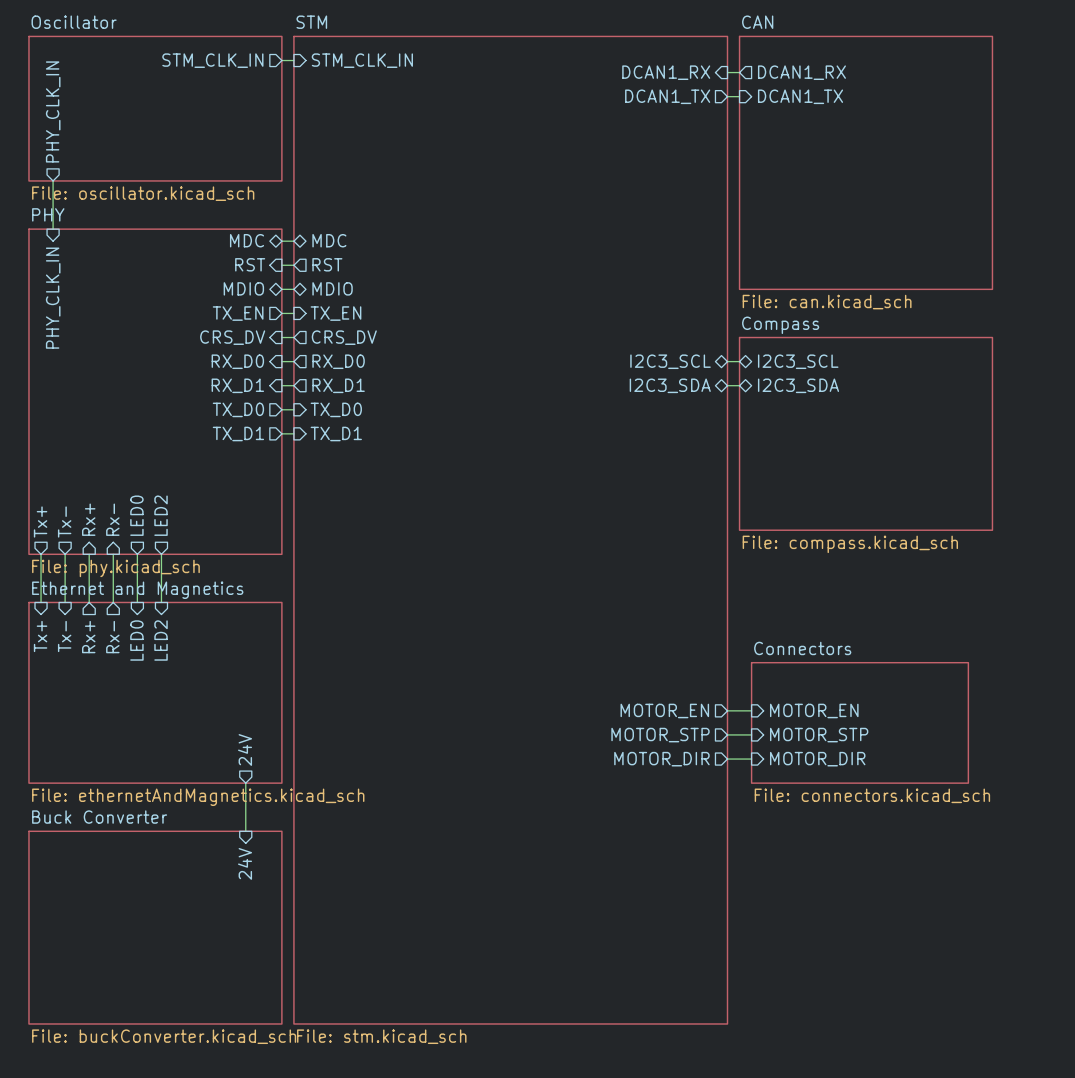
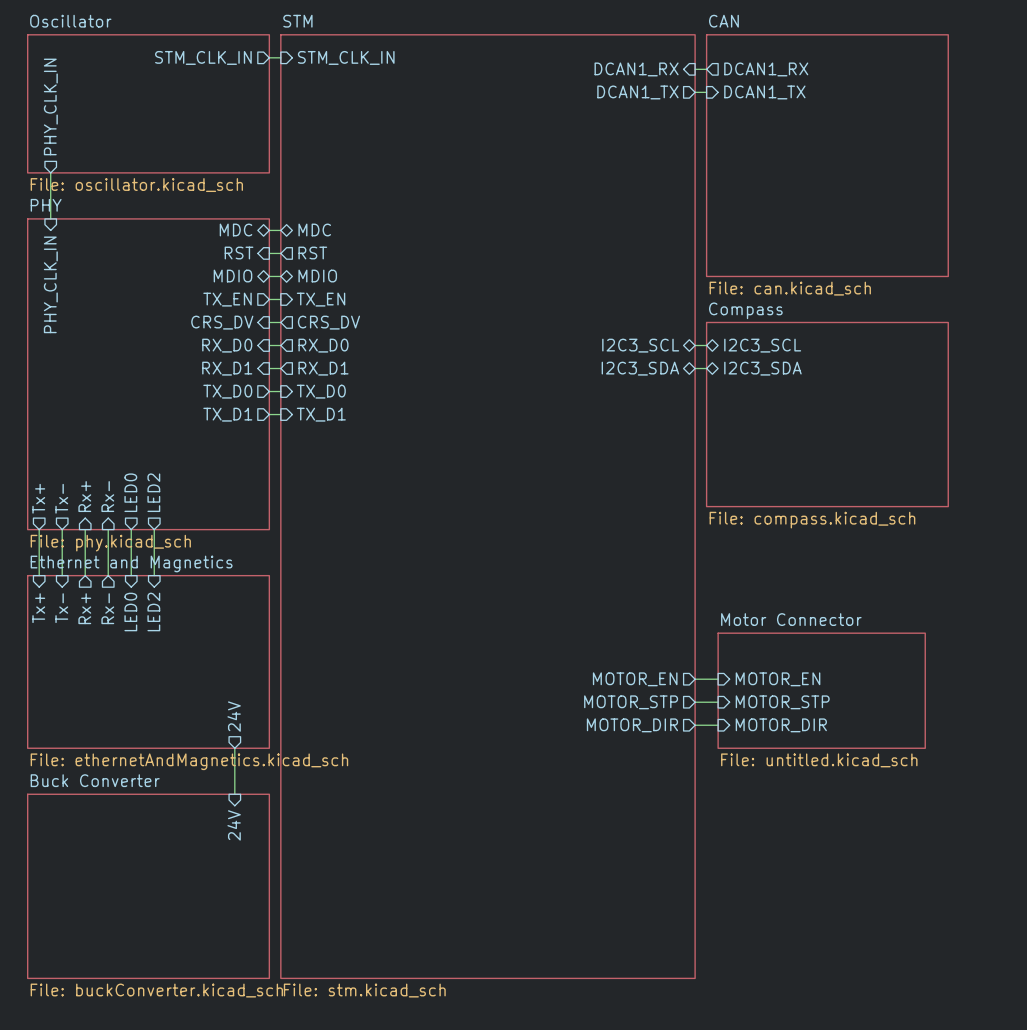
sheet Connectors name: Connectors (802, 648) -> Motor Connector (791, 619)
sheet Connectors value: File: connectors.kicad_sch (872, 795) -> File: untitled.kicad_sch (819, 760)

